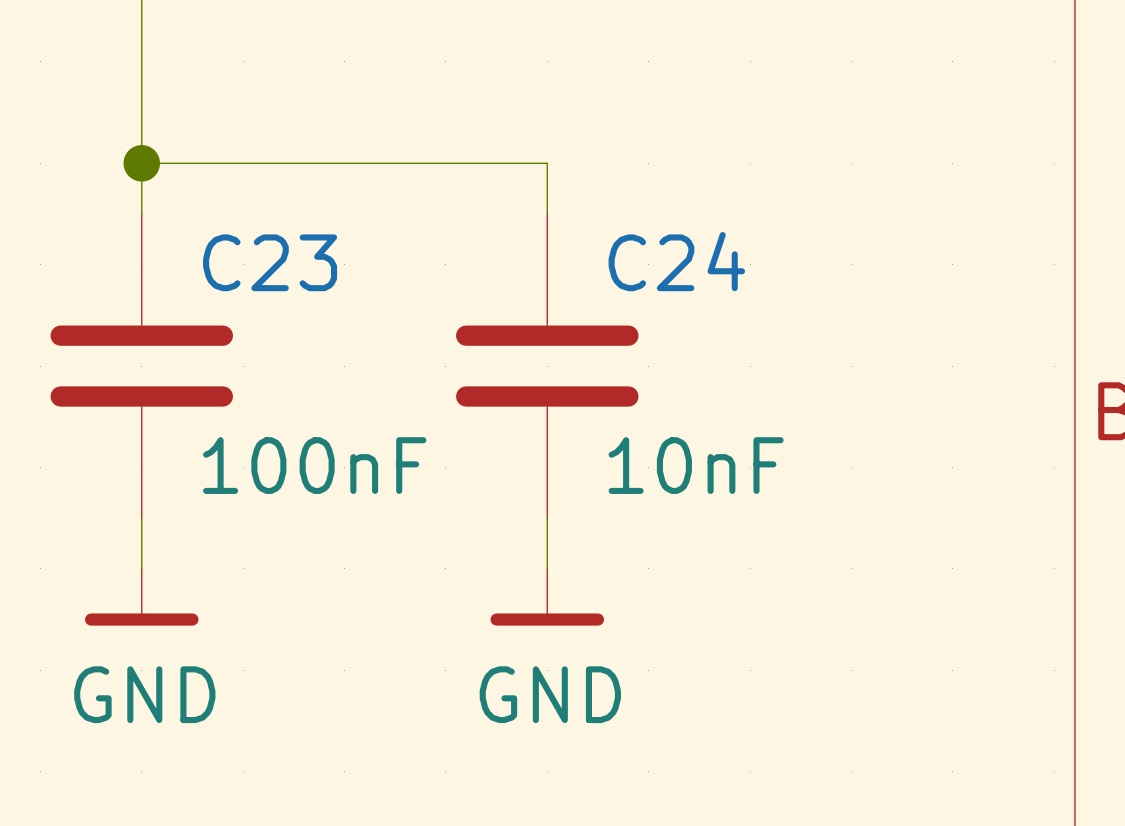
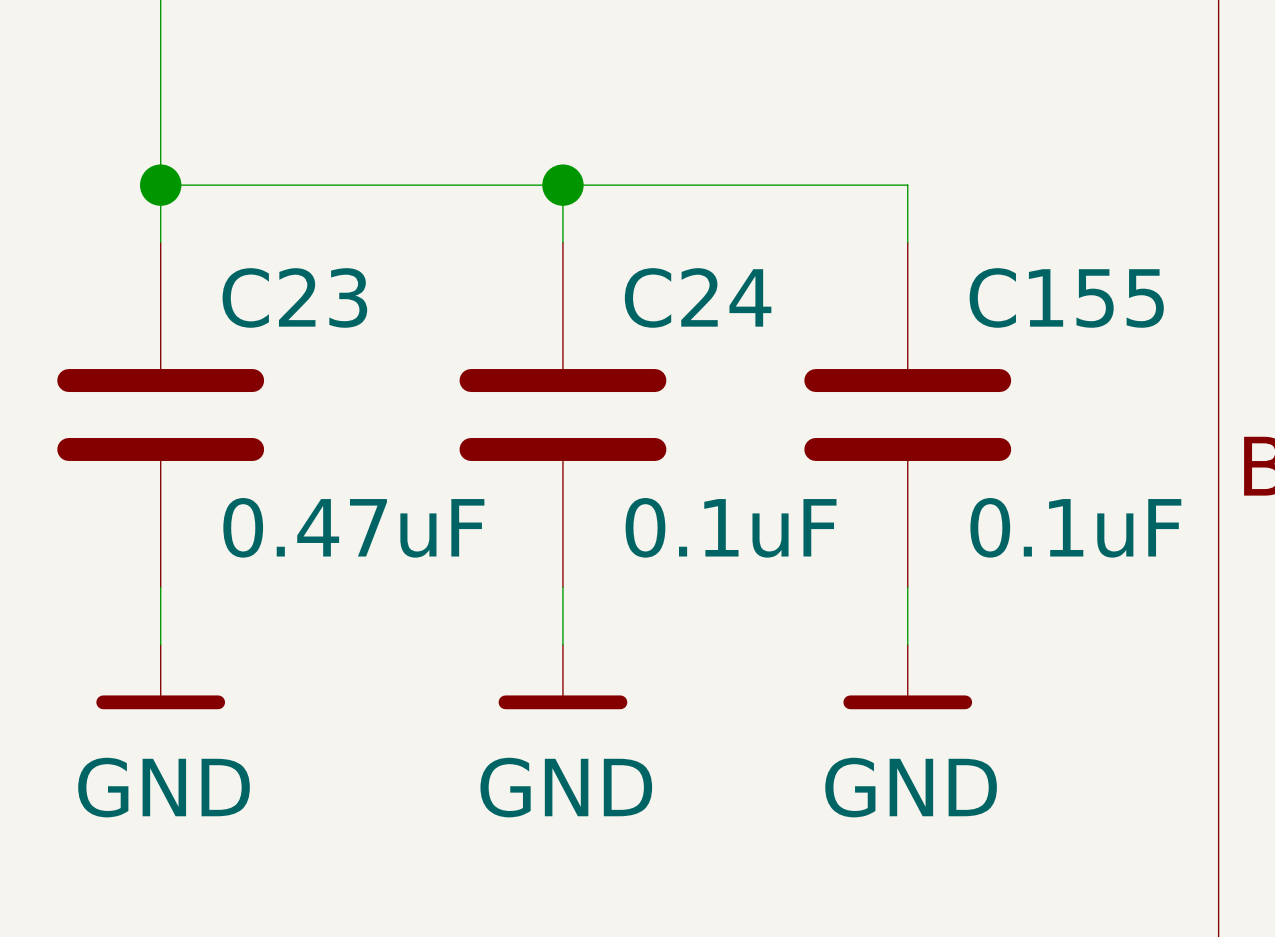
wire: none -> (562, 185) (562, 242)
junction: none -> (562, 185)
wire: (547, 163) (547, 214) -> (620, 185) (907, 185) (907, 242)
C24 position: (547, 366) -> (562, 415)
C155: none -> 0.1uF (907, 415)
C23 value: 100nF (314, 465) -> 0.47uF (353, 527)
C24 value: 10nF (696, 465) -> 0.1uF (731, 527)
wire: (547, 518) (547, 568) -> (562, 587) (562, 644)
wire: none -> (907, 587) (907, 644)
power symbol position: GND (547, 597) -> GND (562, 677)
power symbol: none -> GND (907, 677)

